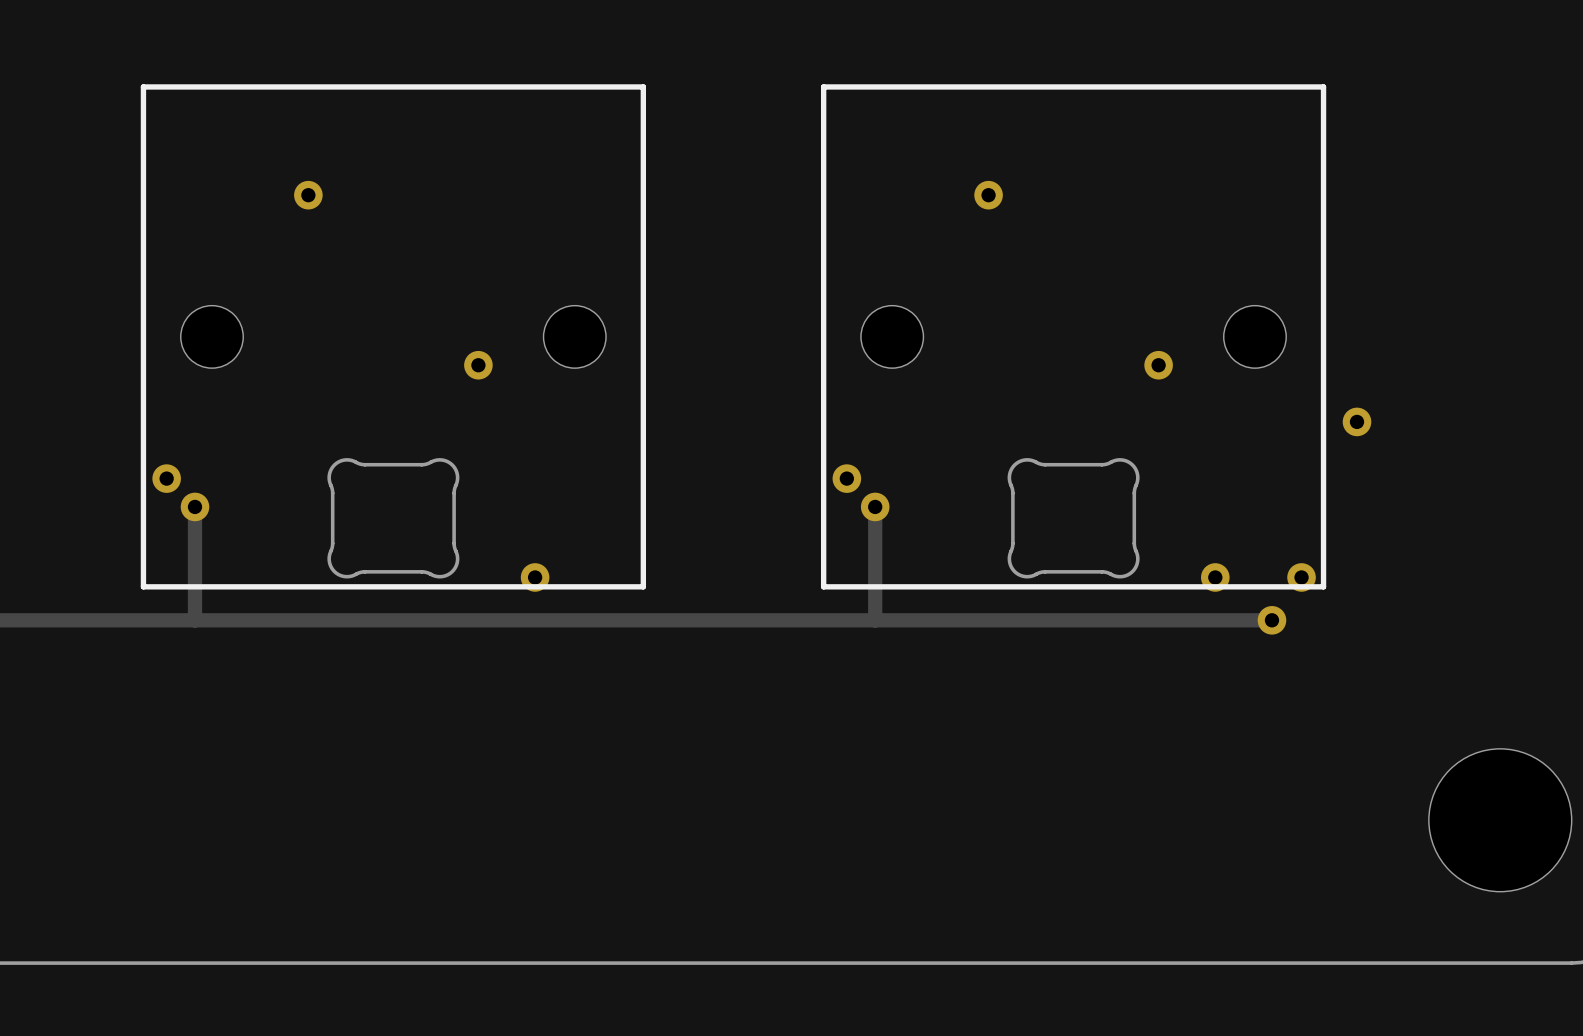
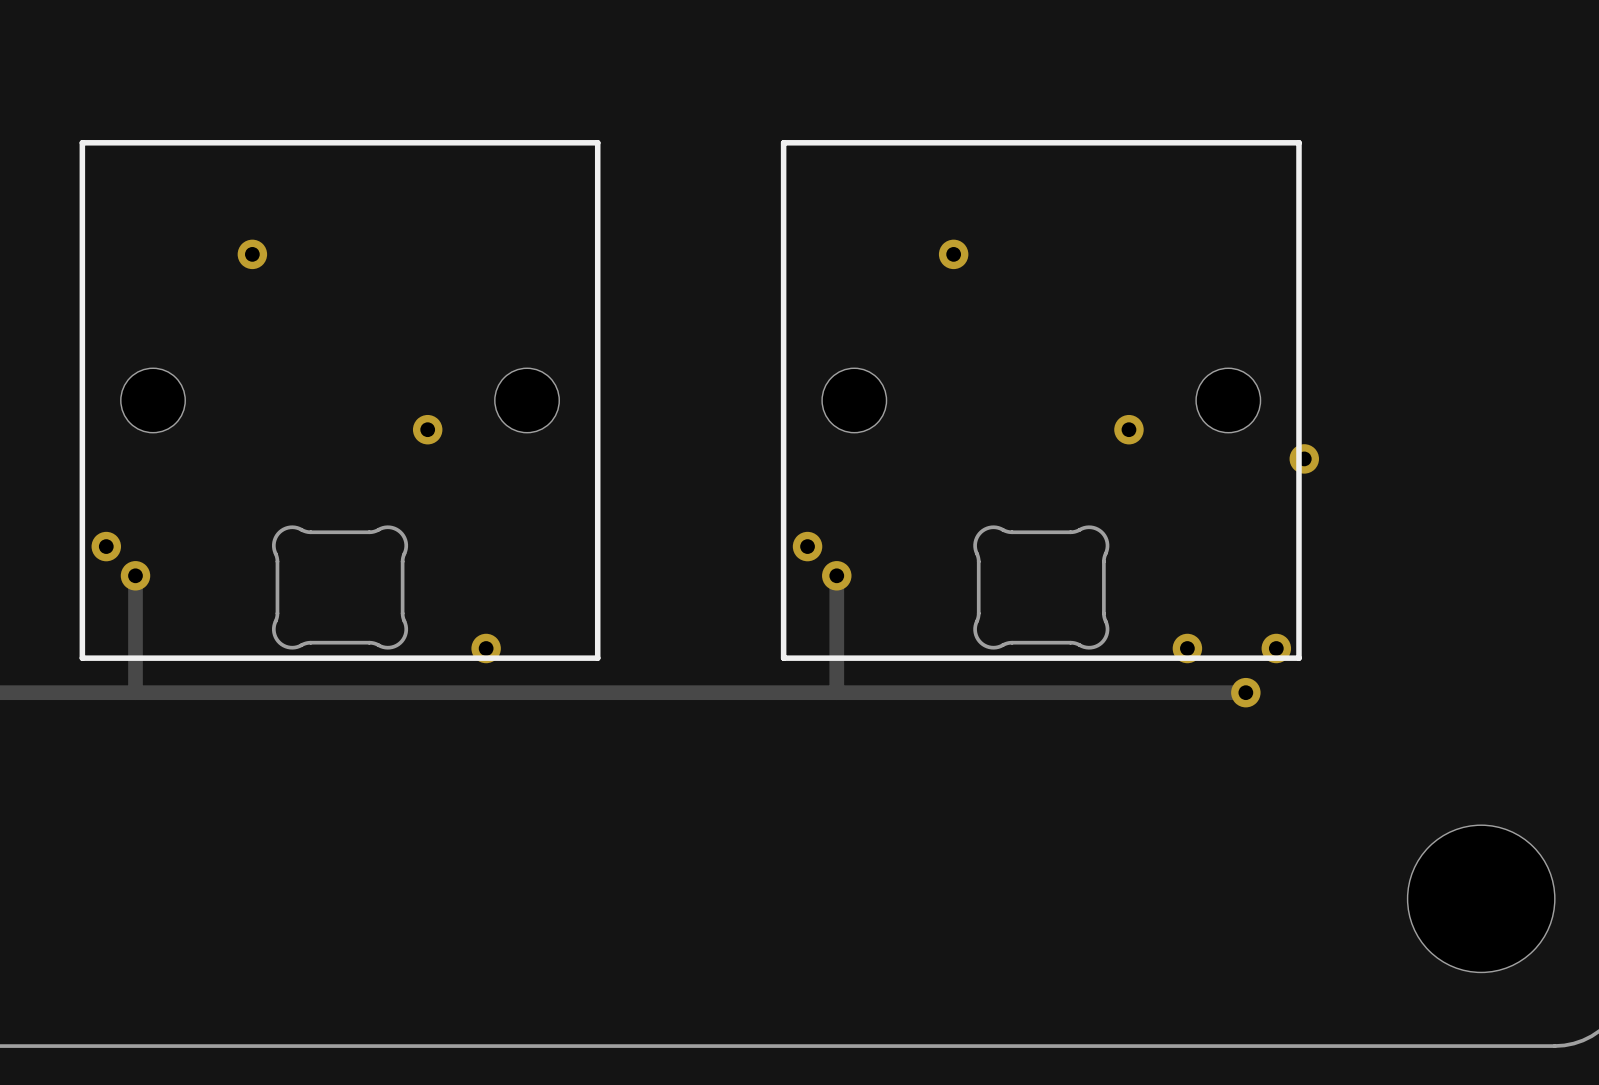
via position: (1357, 421) -> (1304, 458)

